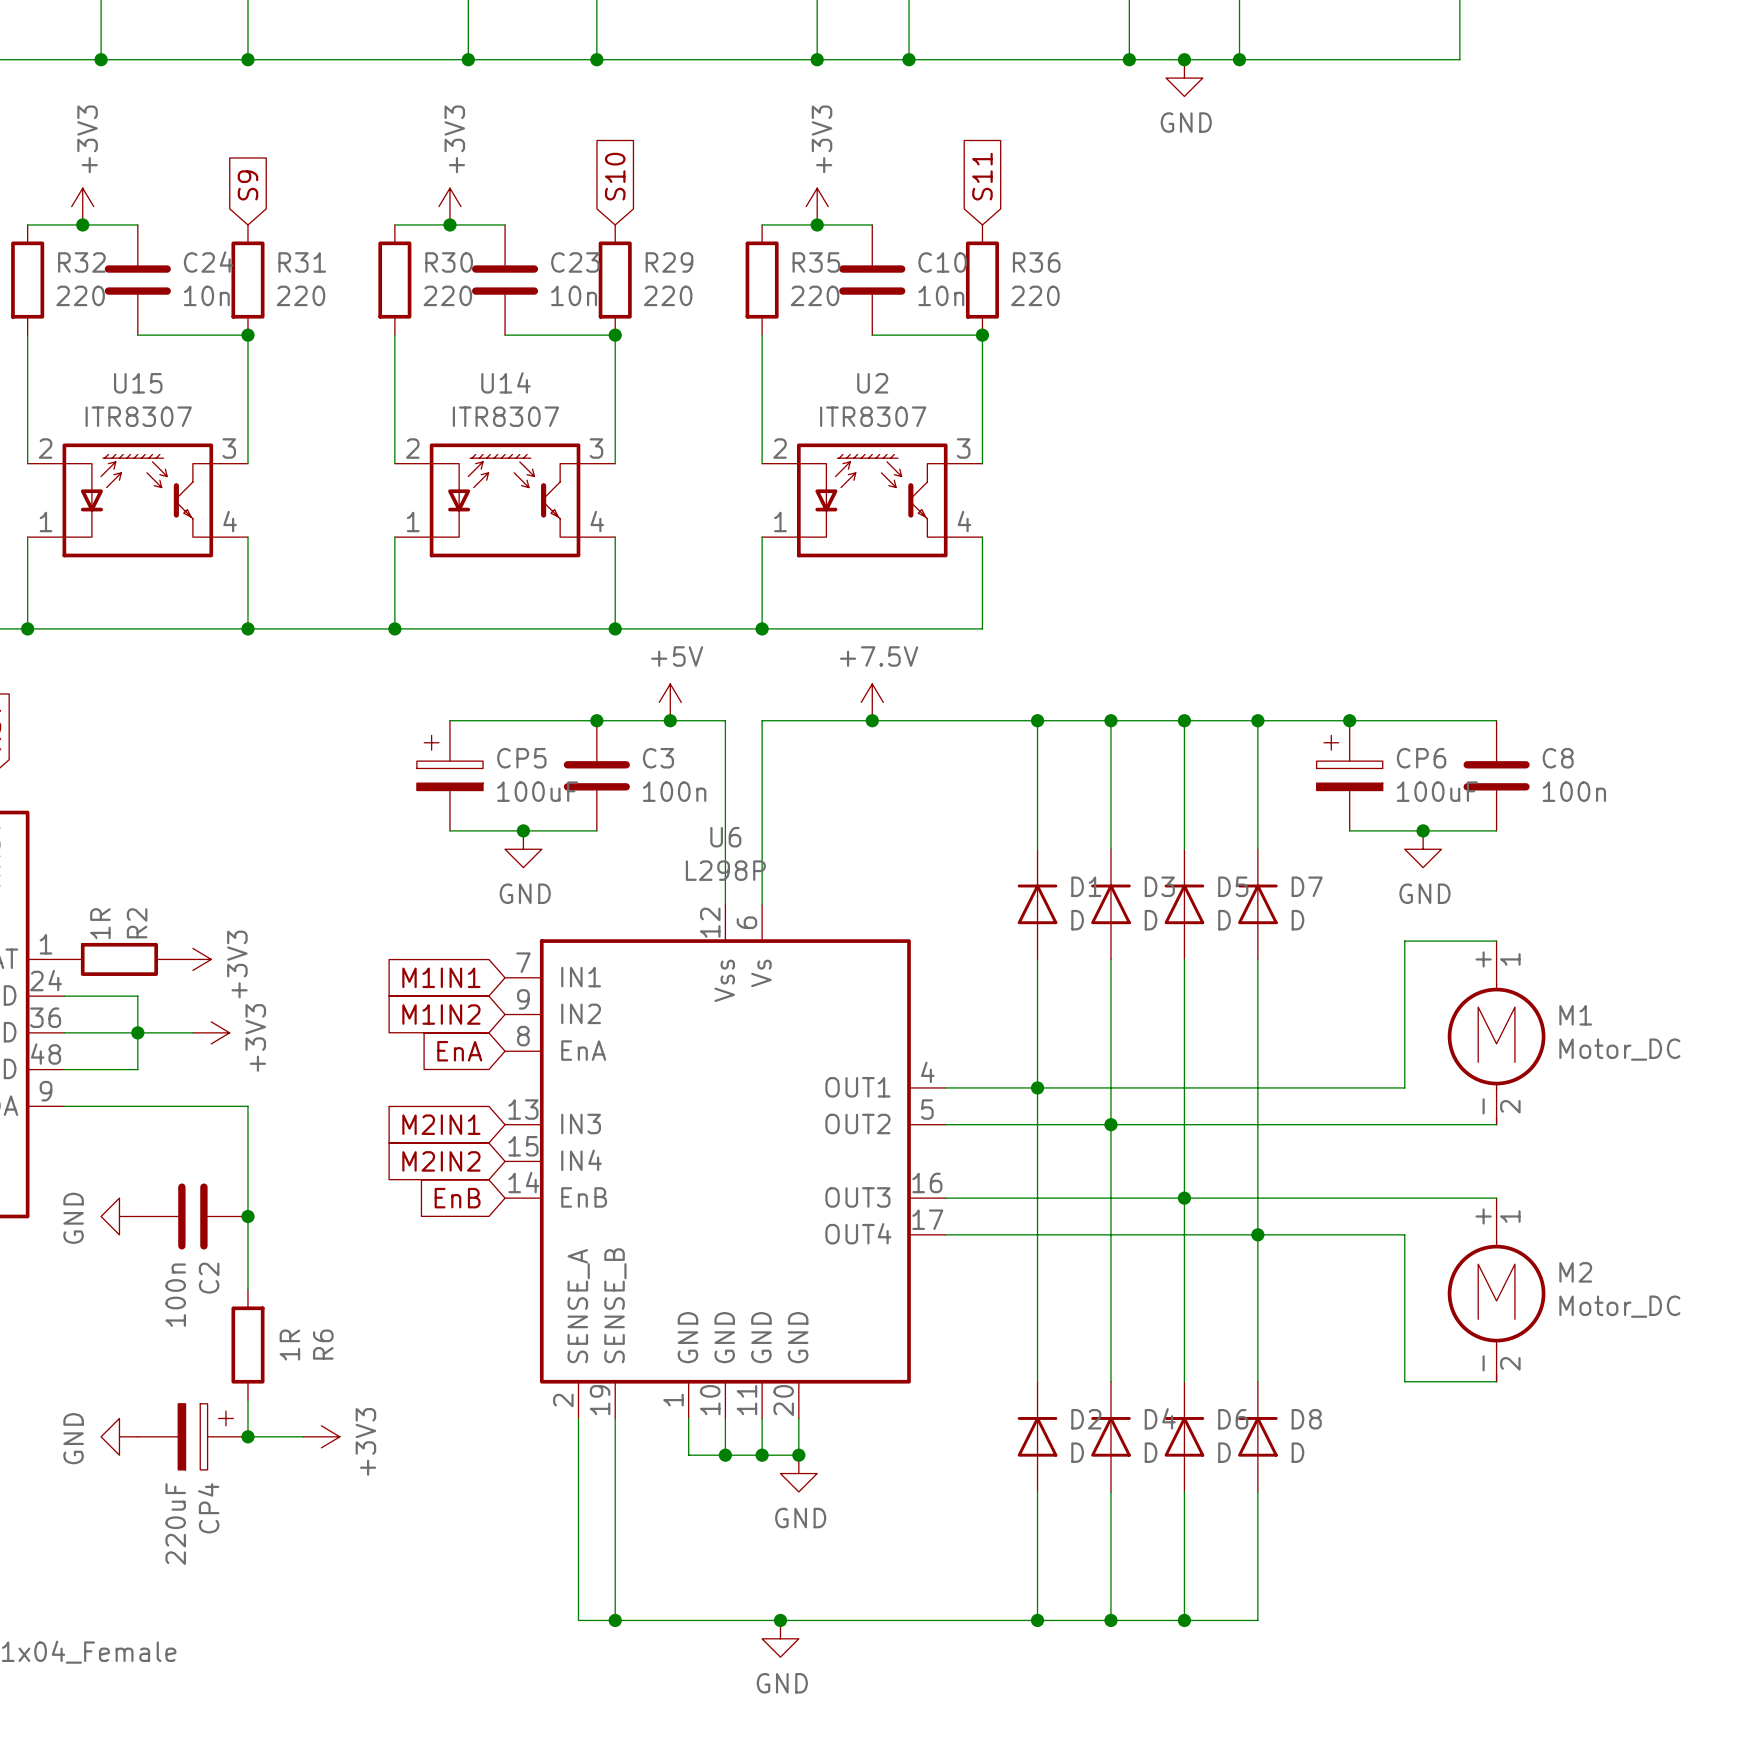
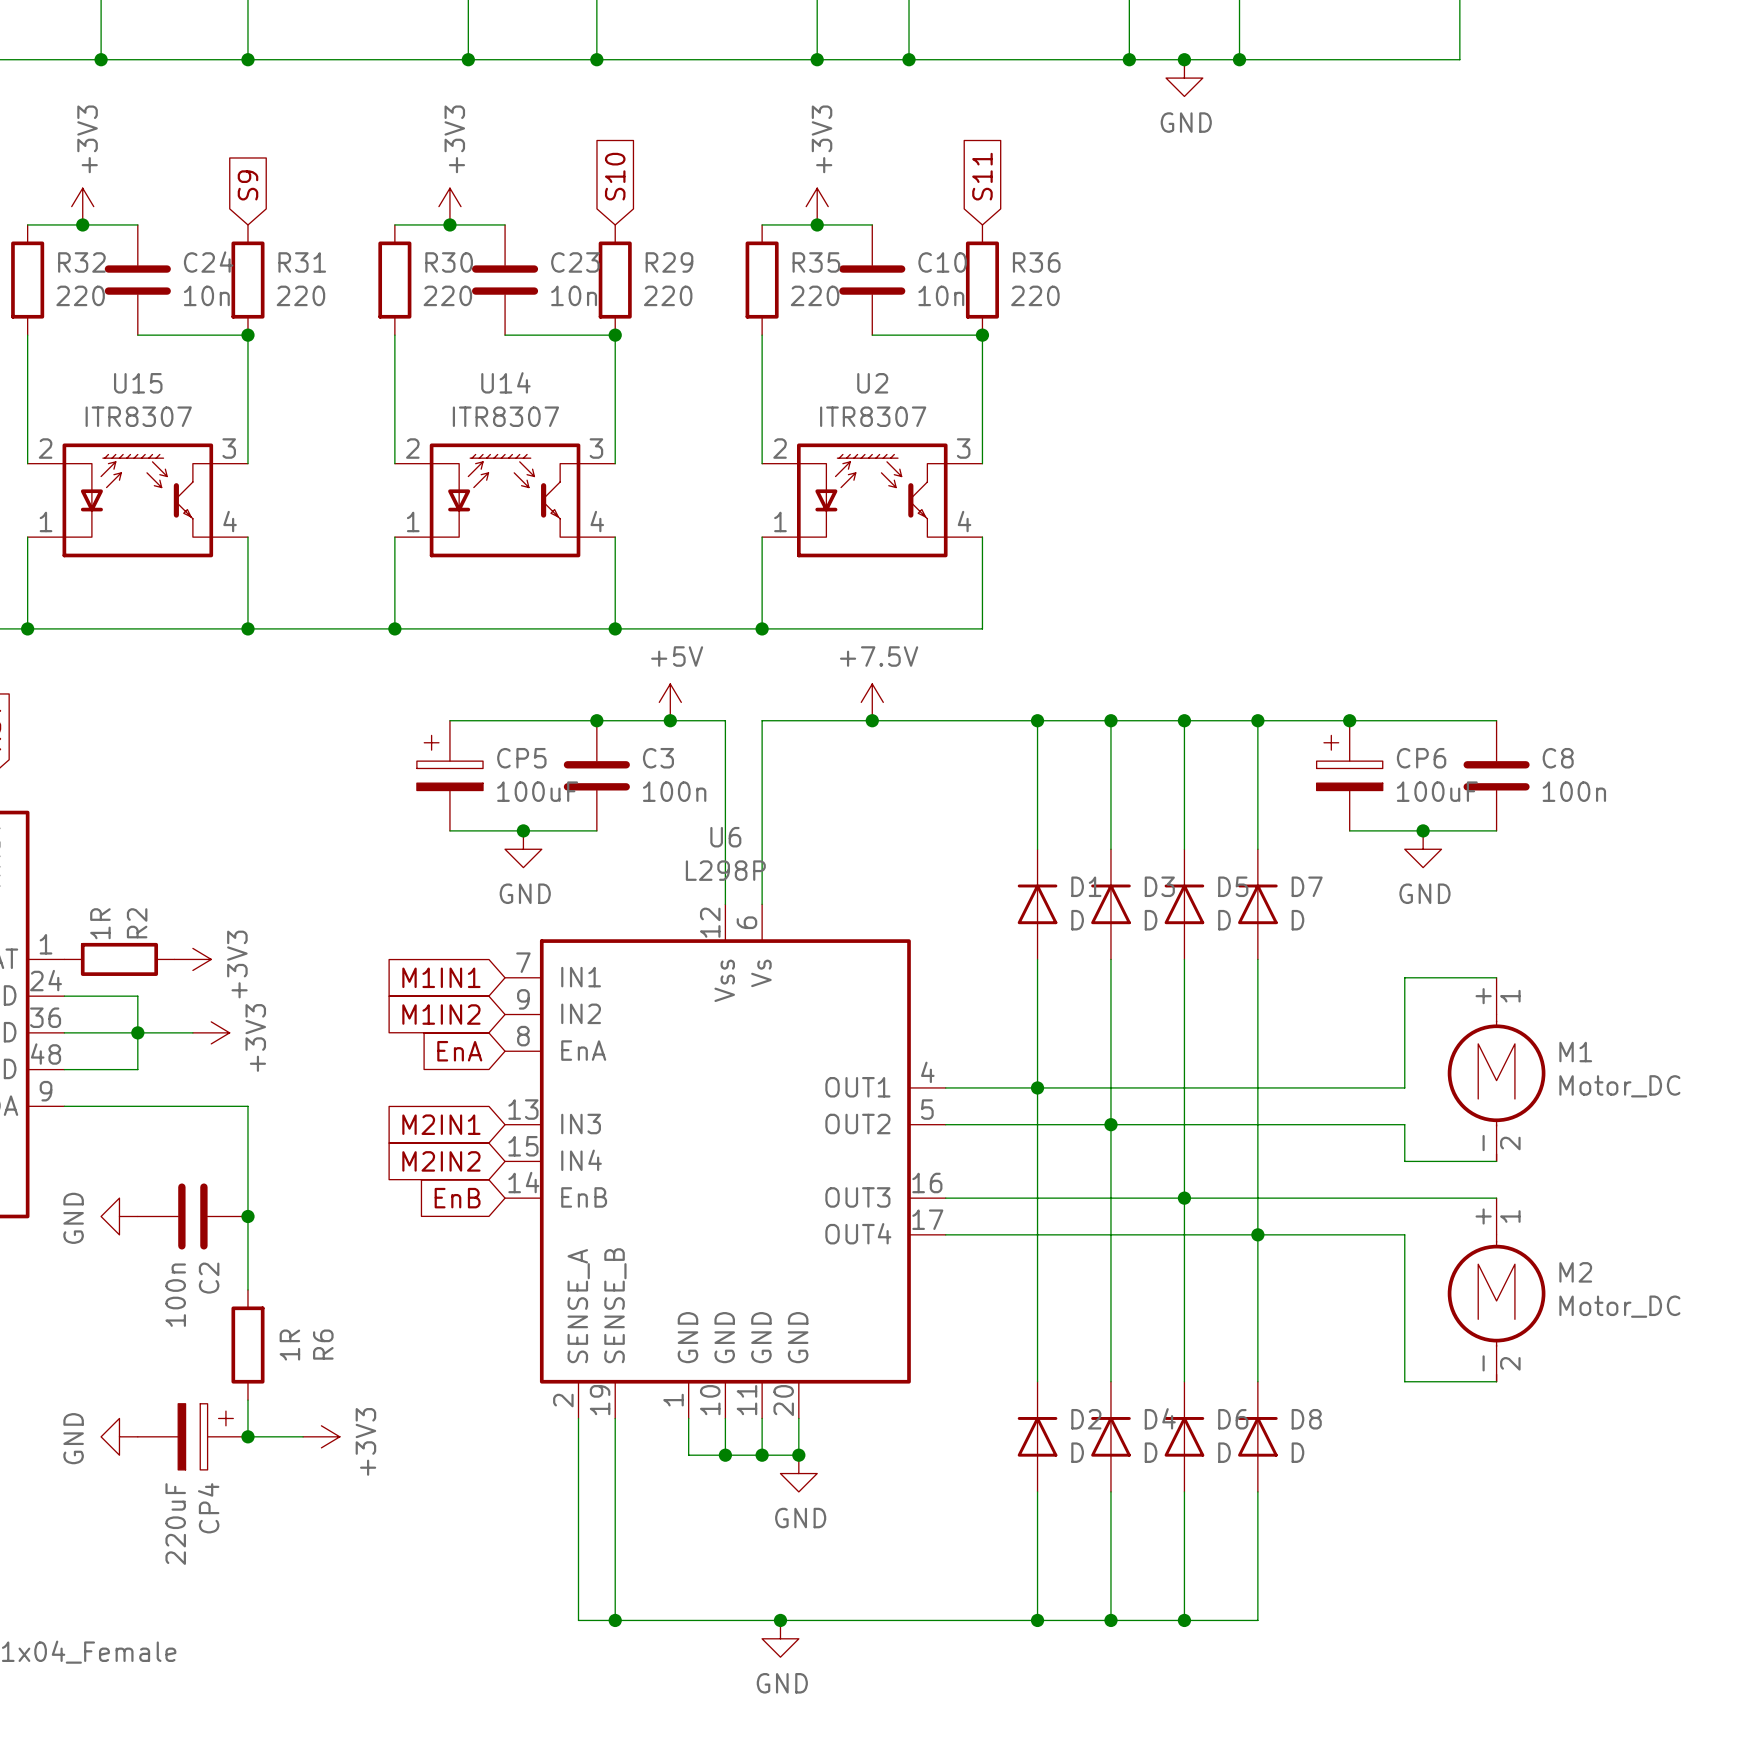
wire: (1496, 941) (1404, 941) (1404, 977) -> (1496, 977) (1404, 977)
M1 position: (1496, 1032) -> (1496, 1069)
wire: (1404, 1124) (1496, 1124) -> (1404, 1124) (1404, 1161) (1496, 1161)

